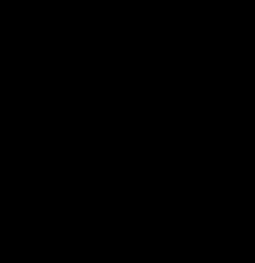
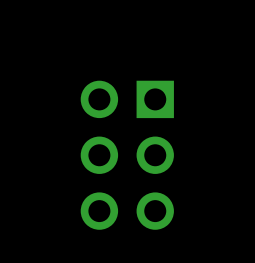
part: none -> (127, 155)

